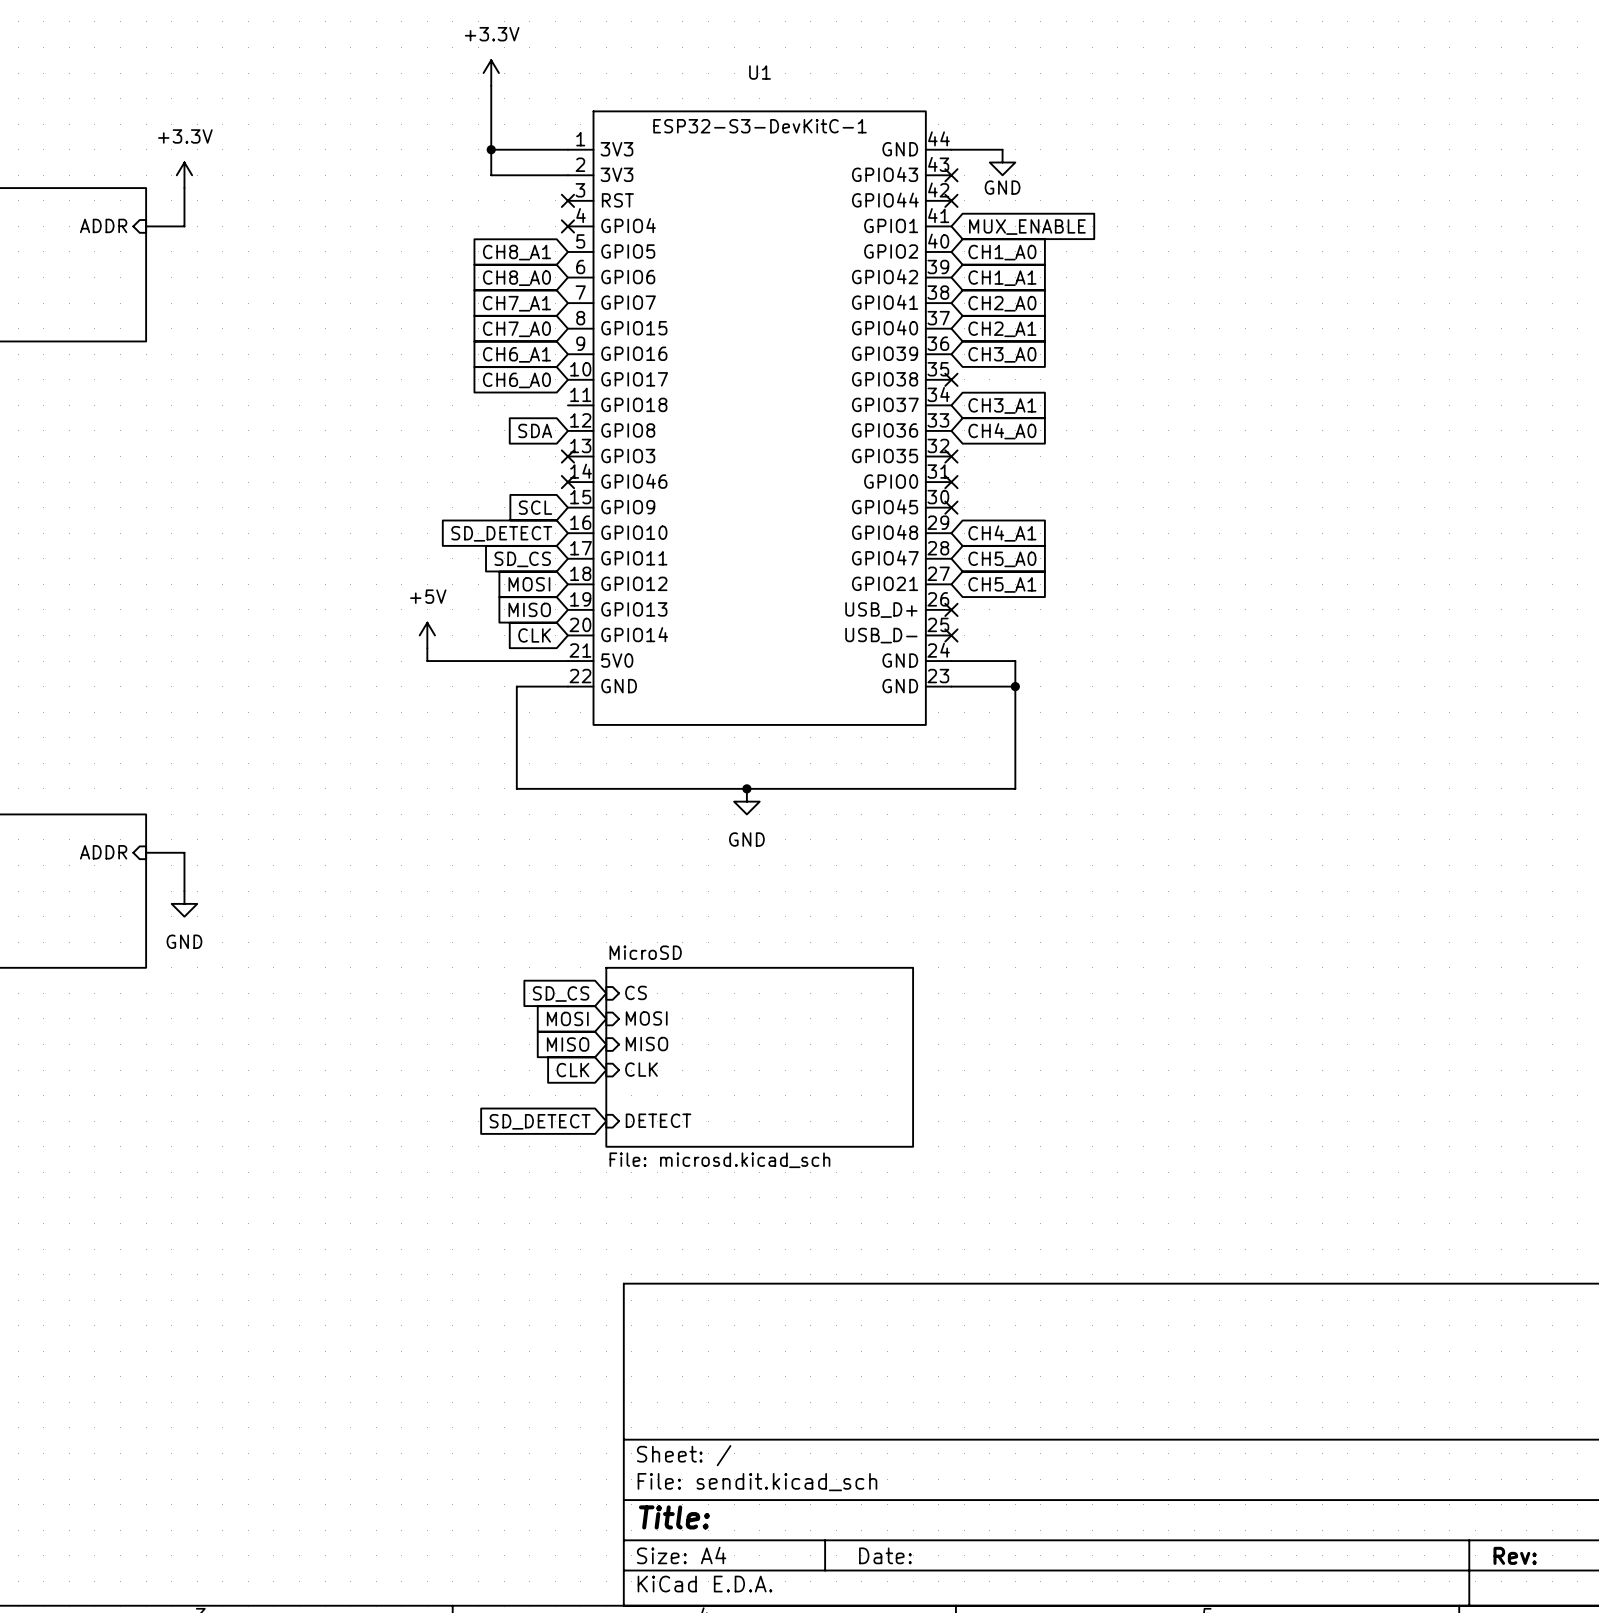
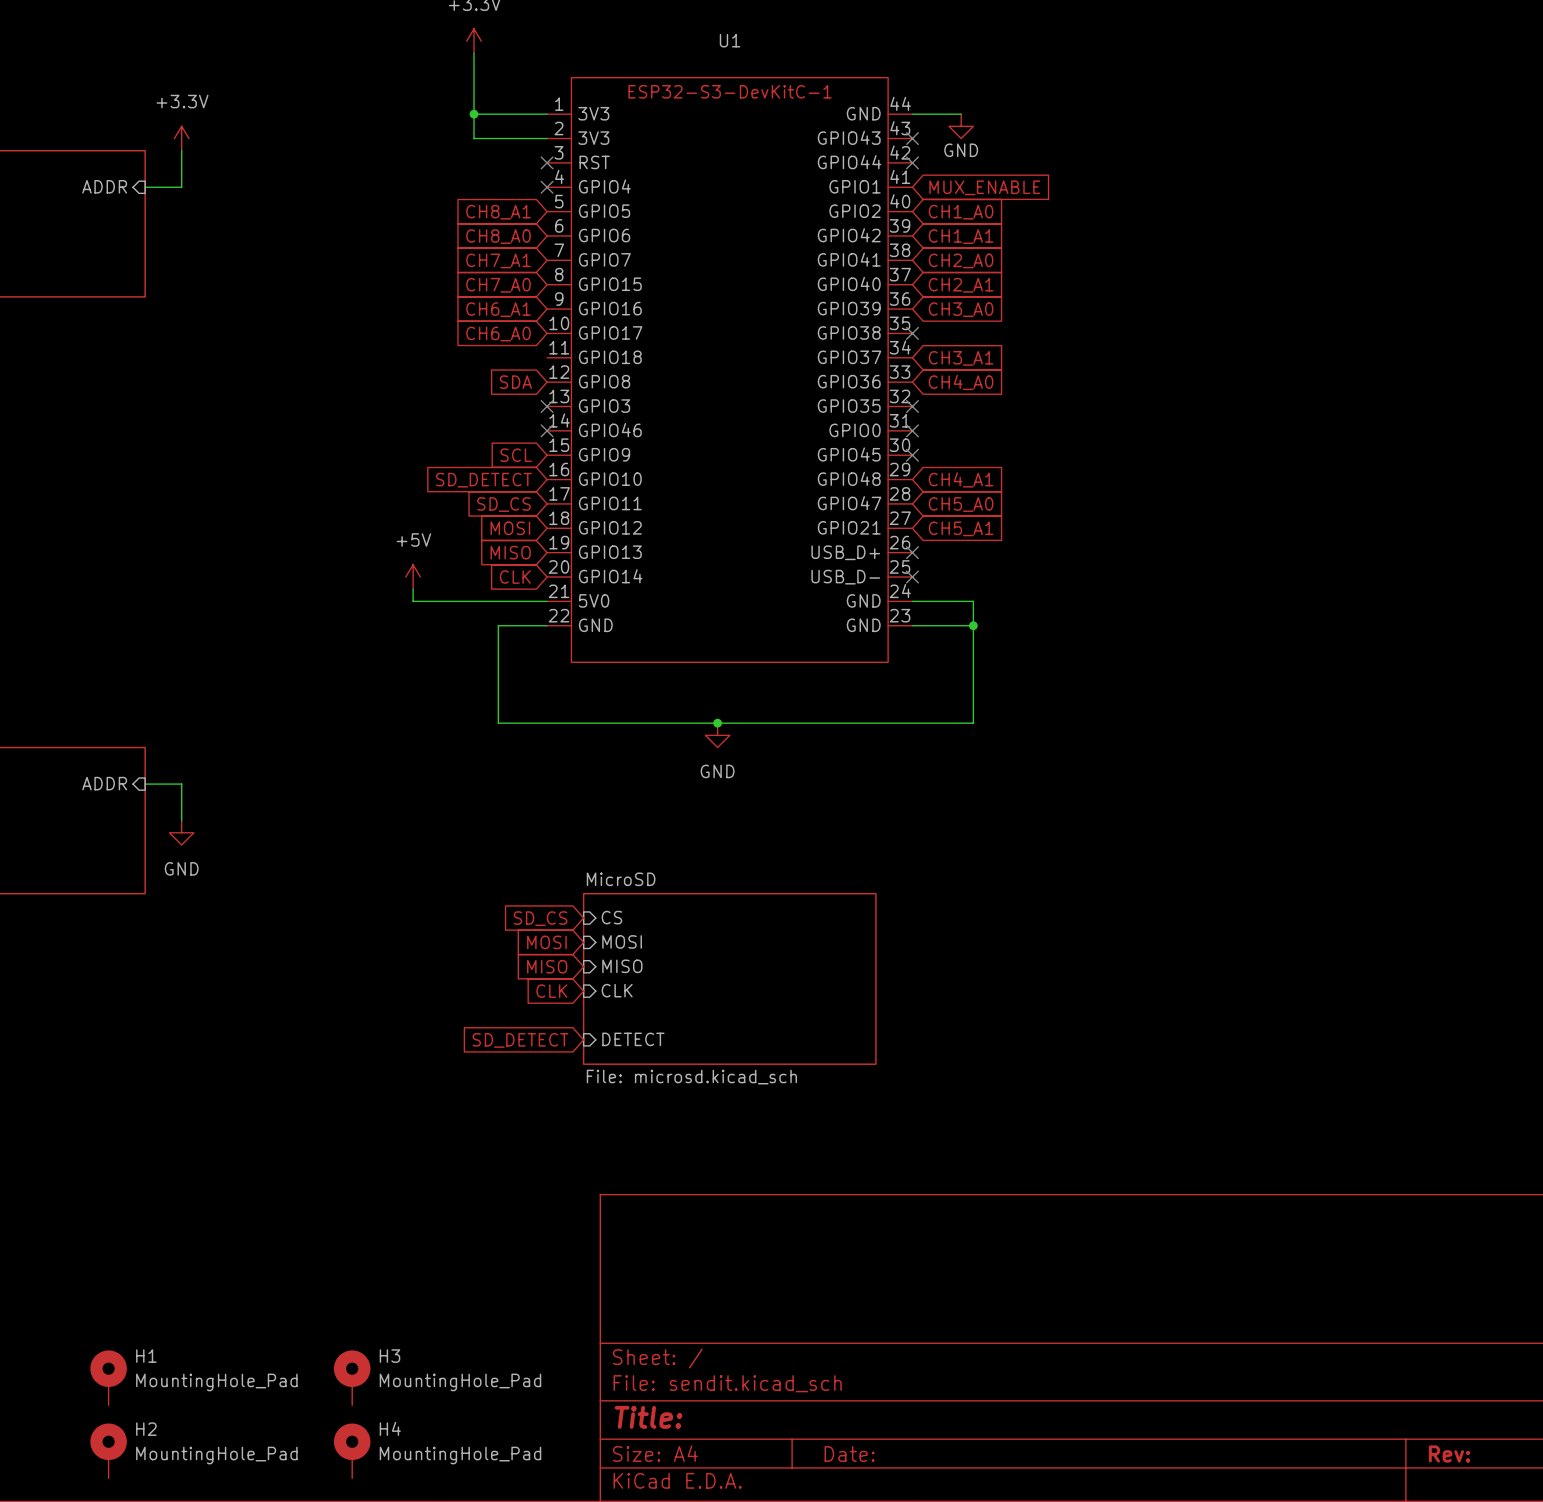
H1: none -> MountingHole_Pad (108, 1377)
H3: none -> MountingHole_Pad (352, 1377)
H2: none -> MountingHole_Pad (108, 1450)
H4: none -> MountingHole_Pad (352, 1450)

